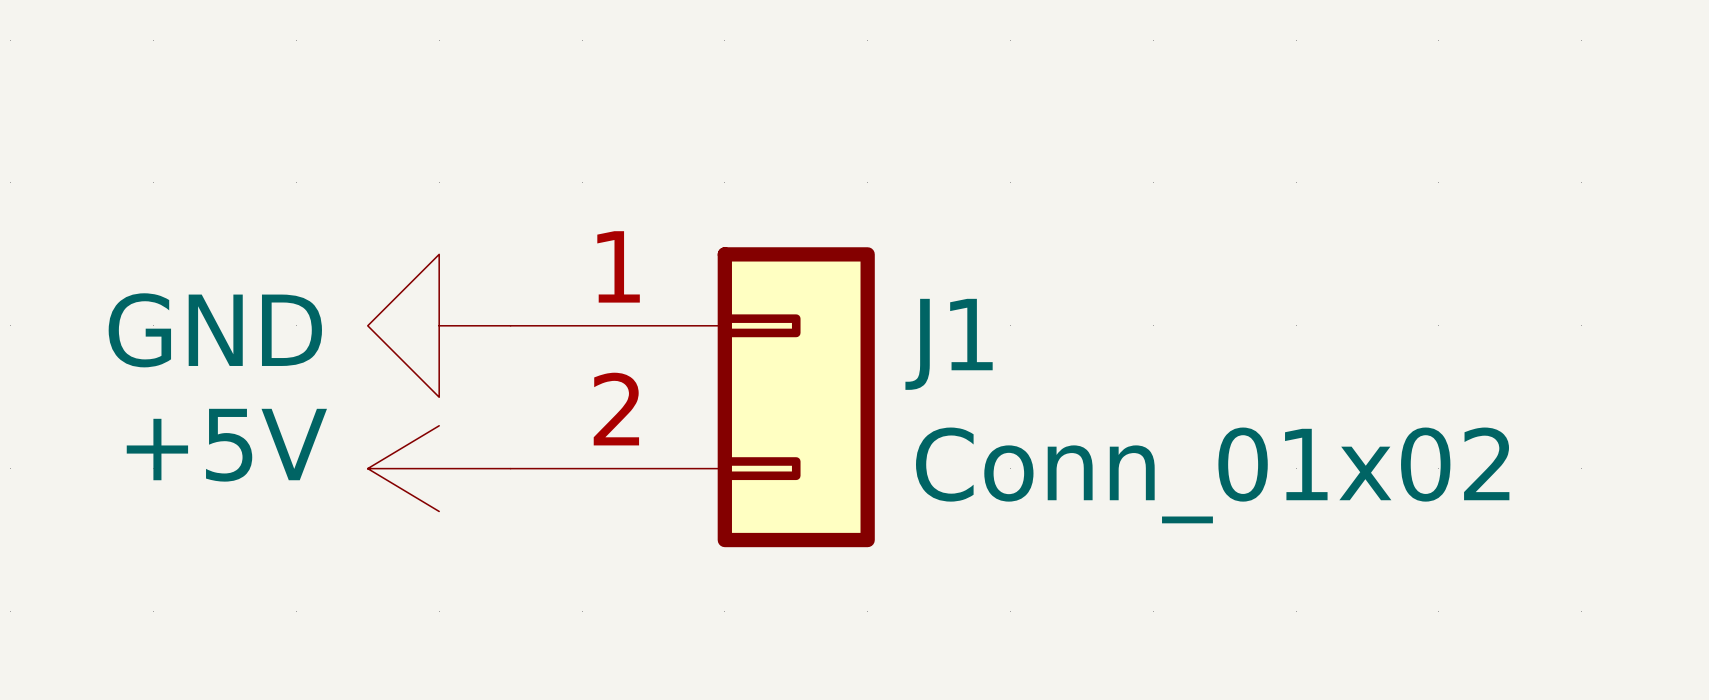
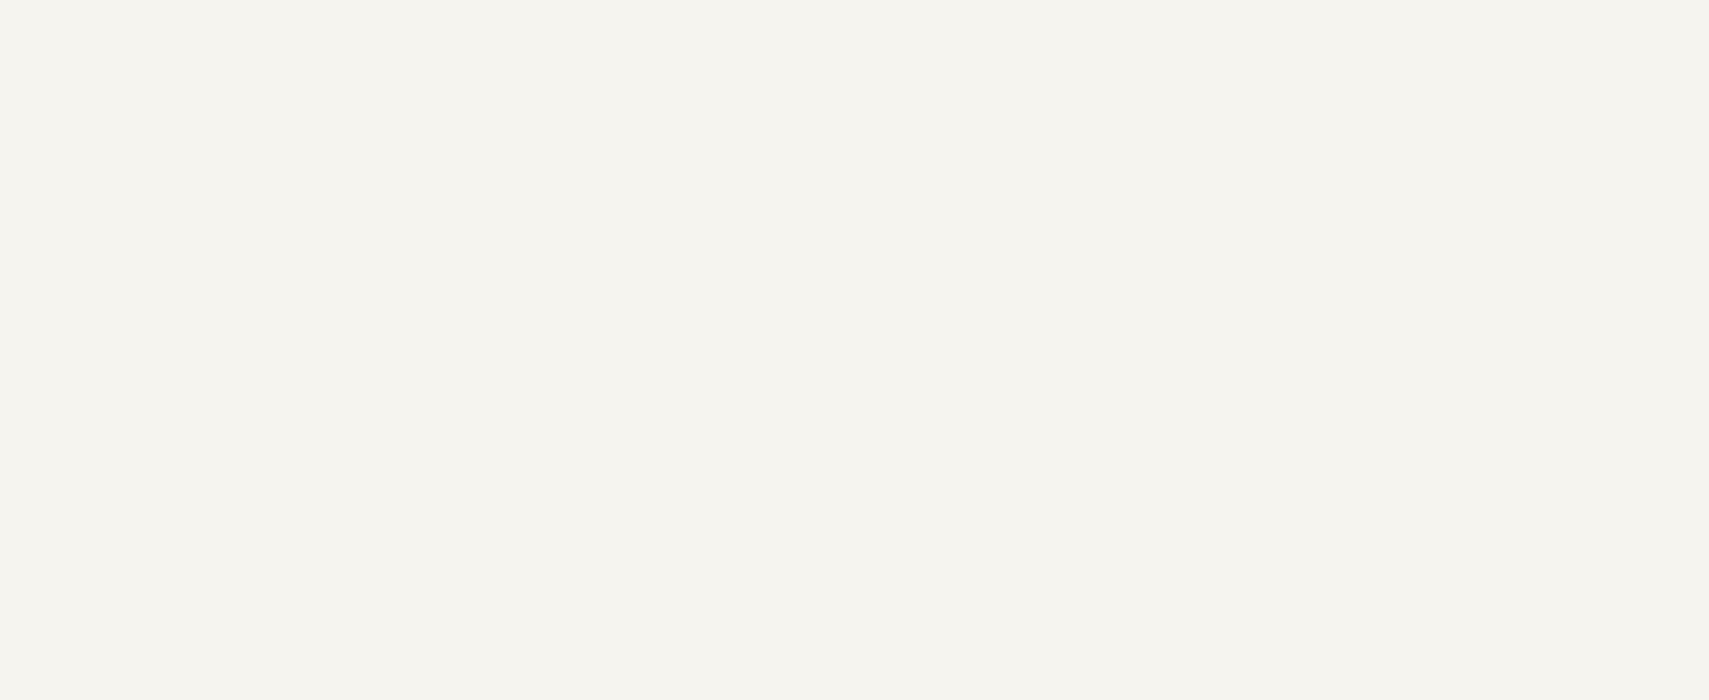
power symbol: GND (439, 325) -> none
J1: Conn_01x02 (692, 397) -> none
power symbol: +5V (439, 468) -> none

